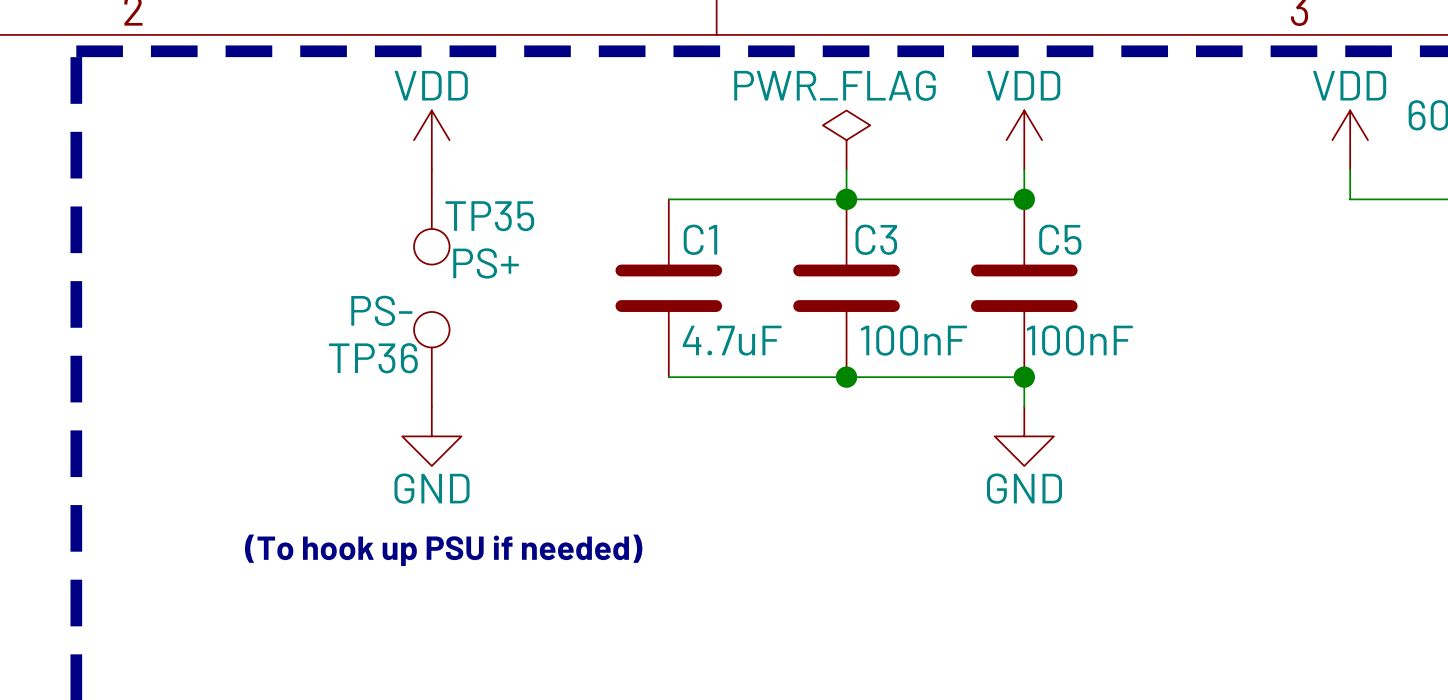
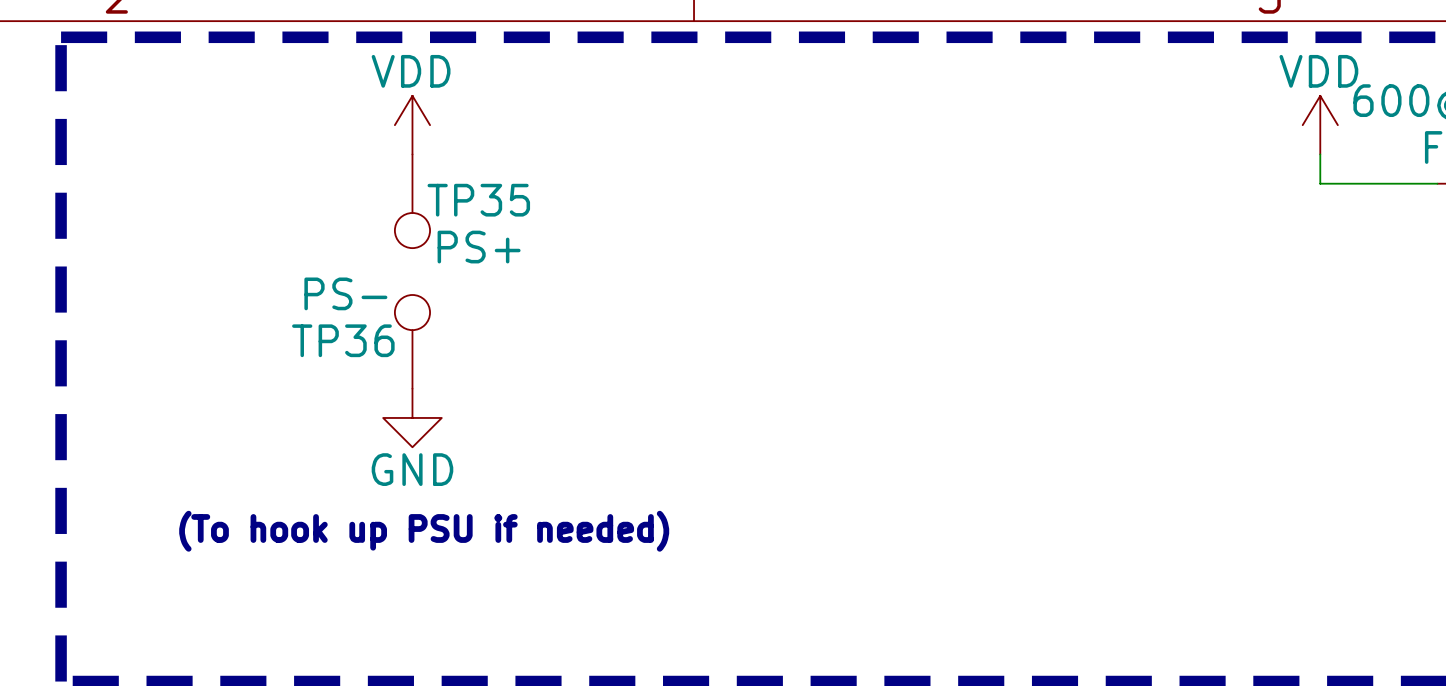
power symbol: PWR_FLAG (846, 140) -> none
power symbol: VDD (1024, 140) -> none
wire: (846, 169) (846, 199) -> none
wire: (1024, 169) (1024, 199) (668, 199) -> none
junction: (846, 199) -> none
junction: (1024, 199) -> none
C1: 4.7uF (668, 288) -> none
C3: 100nF (846, 288) -> none
C5: 100nF (1024, 288) -> none
wire: (668, 377) (1024, 377) (1024, 406) -> none
junction: (846, 377) -> none
junction: (1024, 377) -> none
power symbol: GND (1024, 436) -> none

